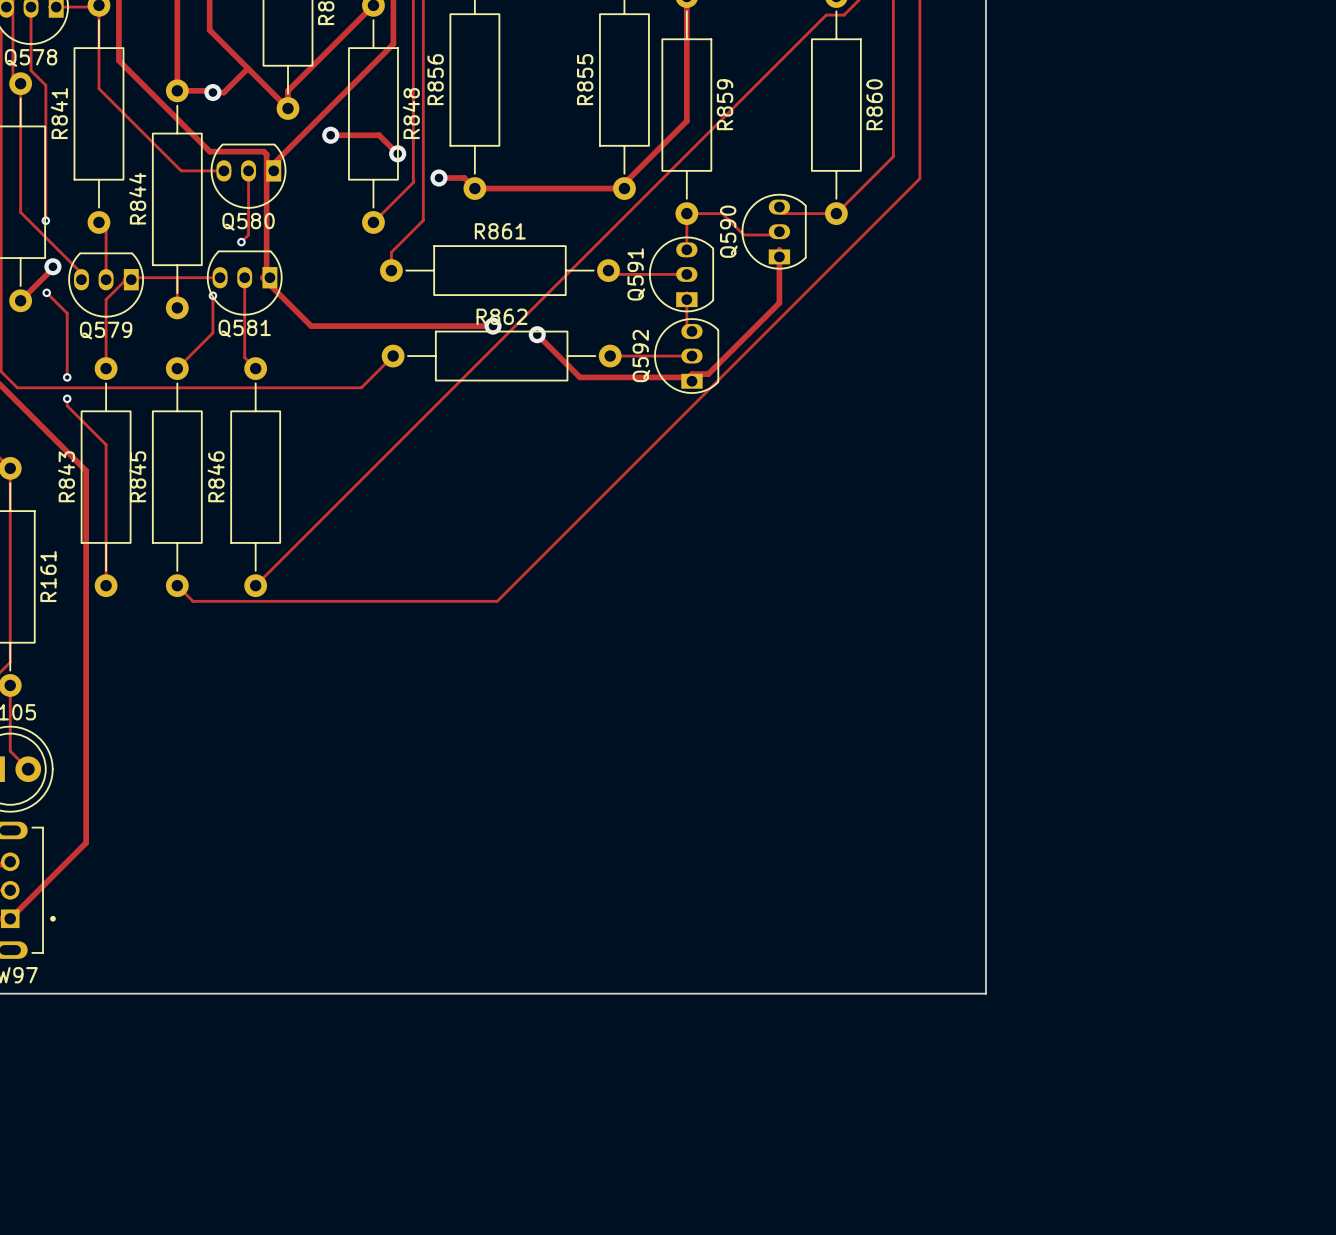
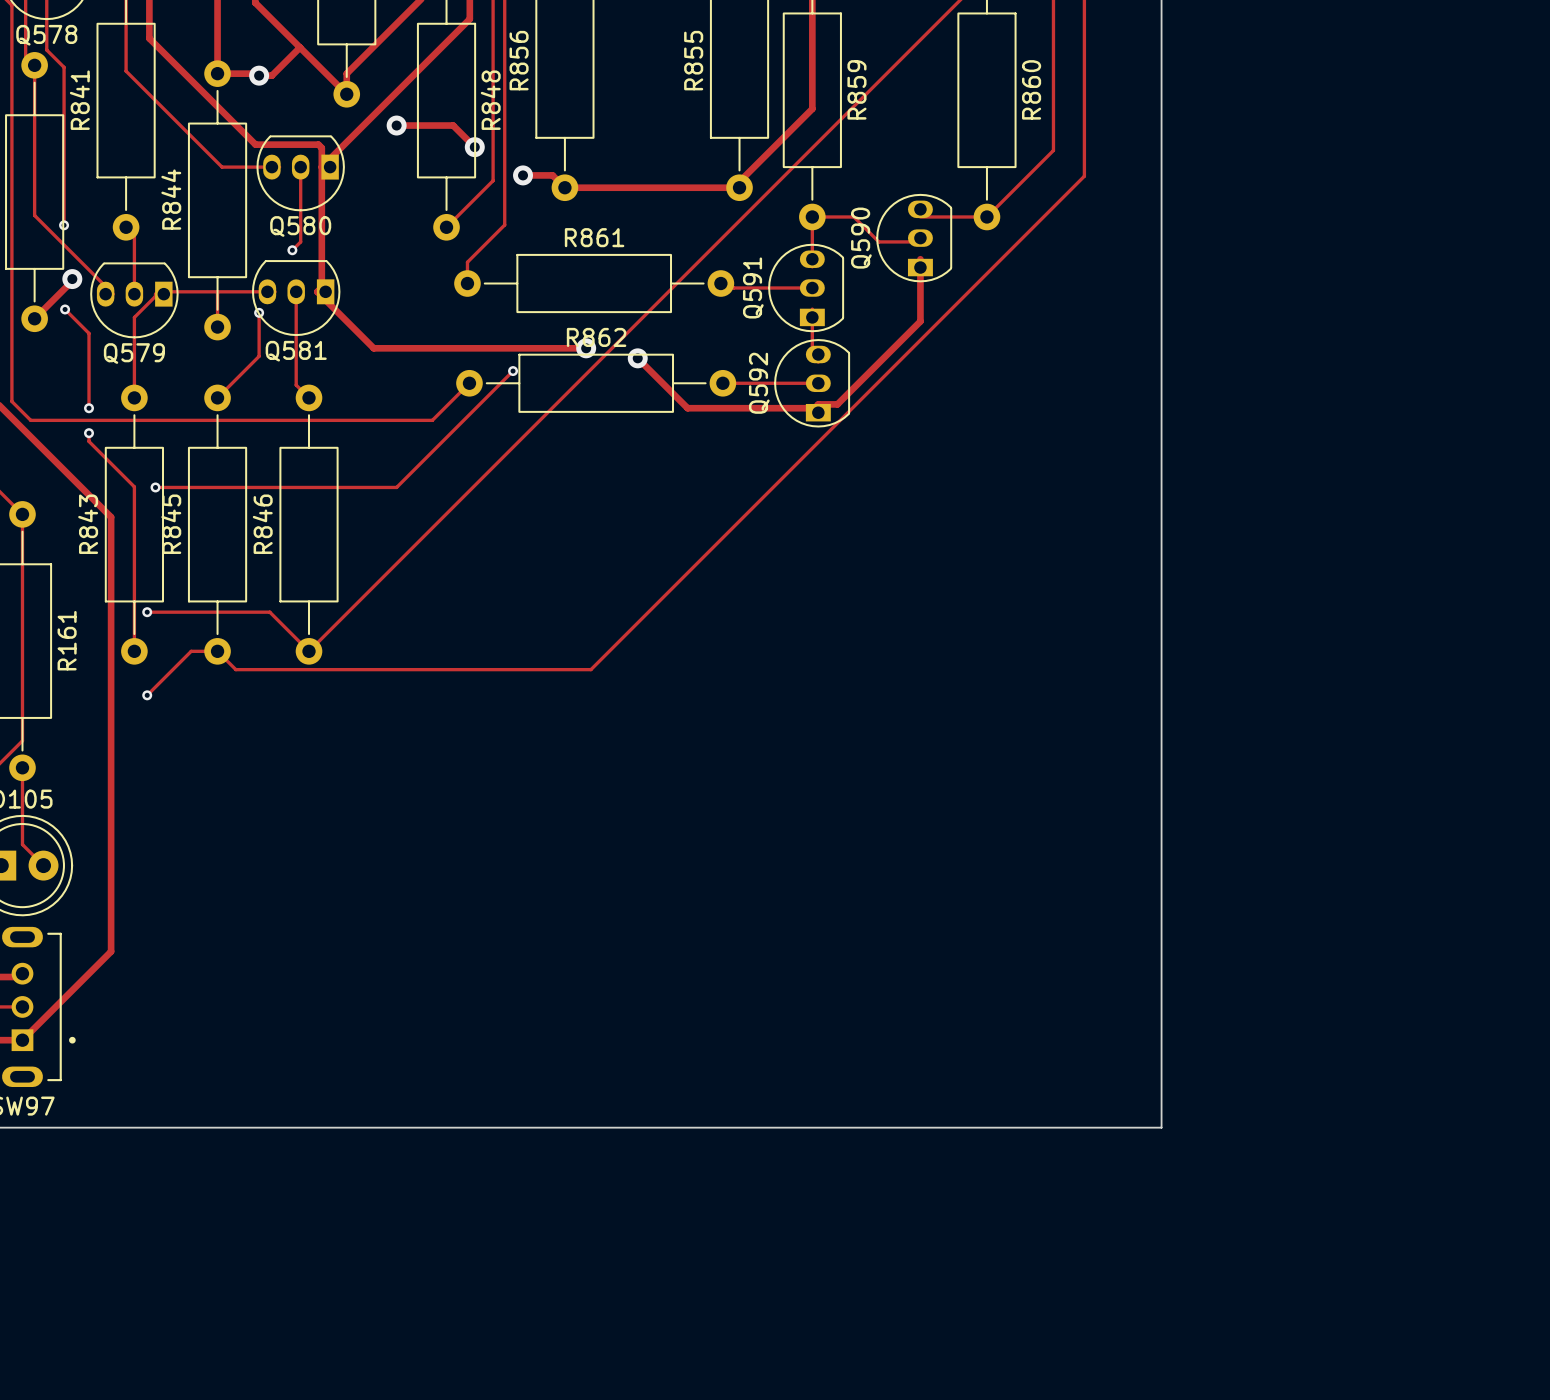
track: none -> (513, 371) (396, 487) (155, 487)
via: none -> (513, 371)
via: none -> (155, 487)
track: none -> (147, 612) (269, 612) (309, 651)
via: none -> (147, 612)
track: none -> (217, 651) (191, 651) (147, 695)
via: none -> (147, 695)

